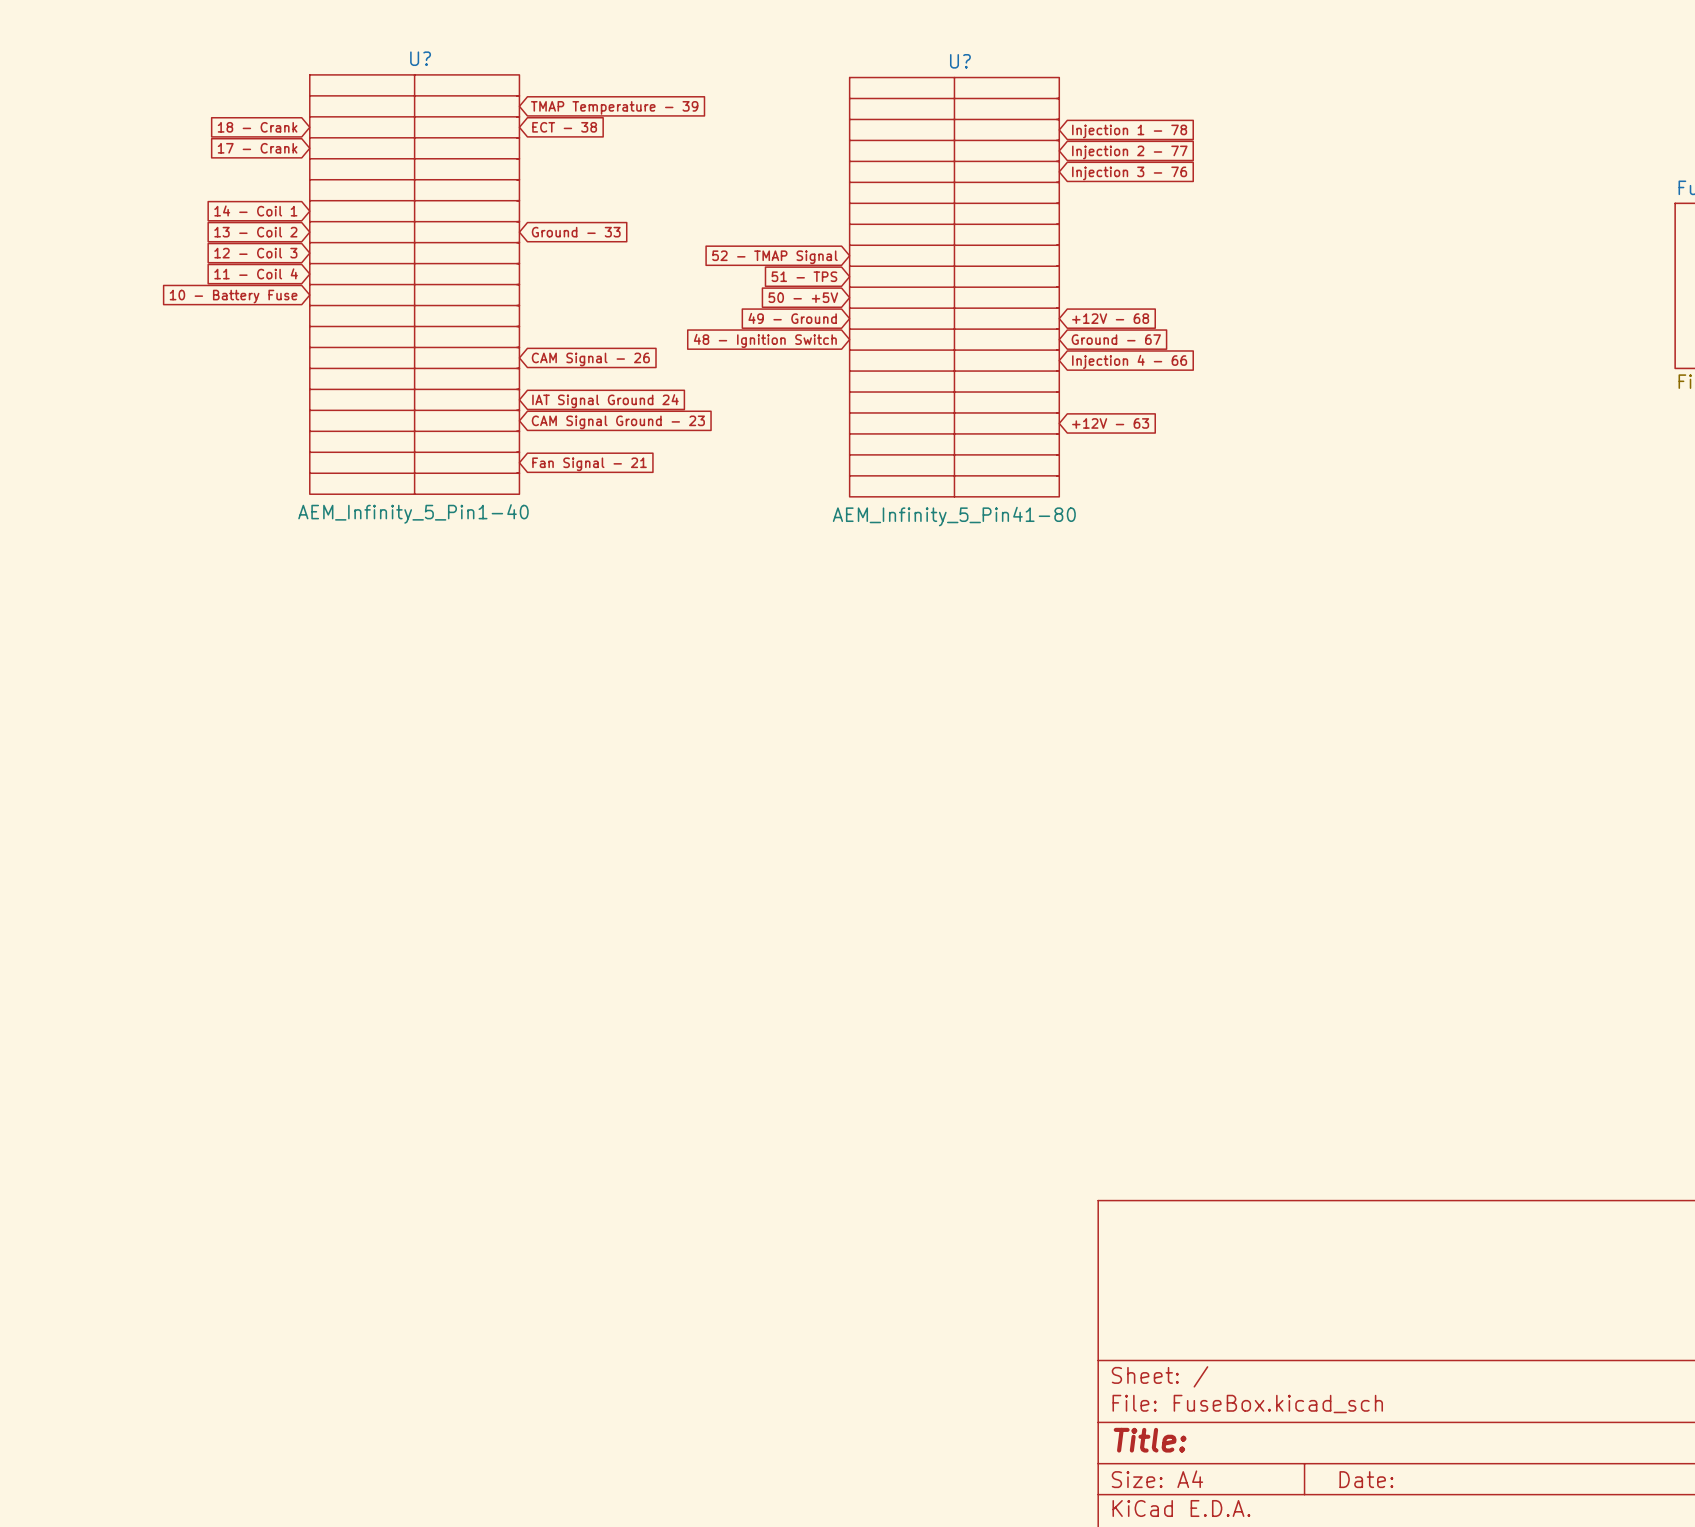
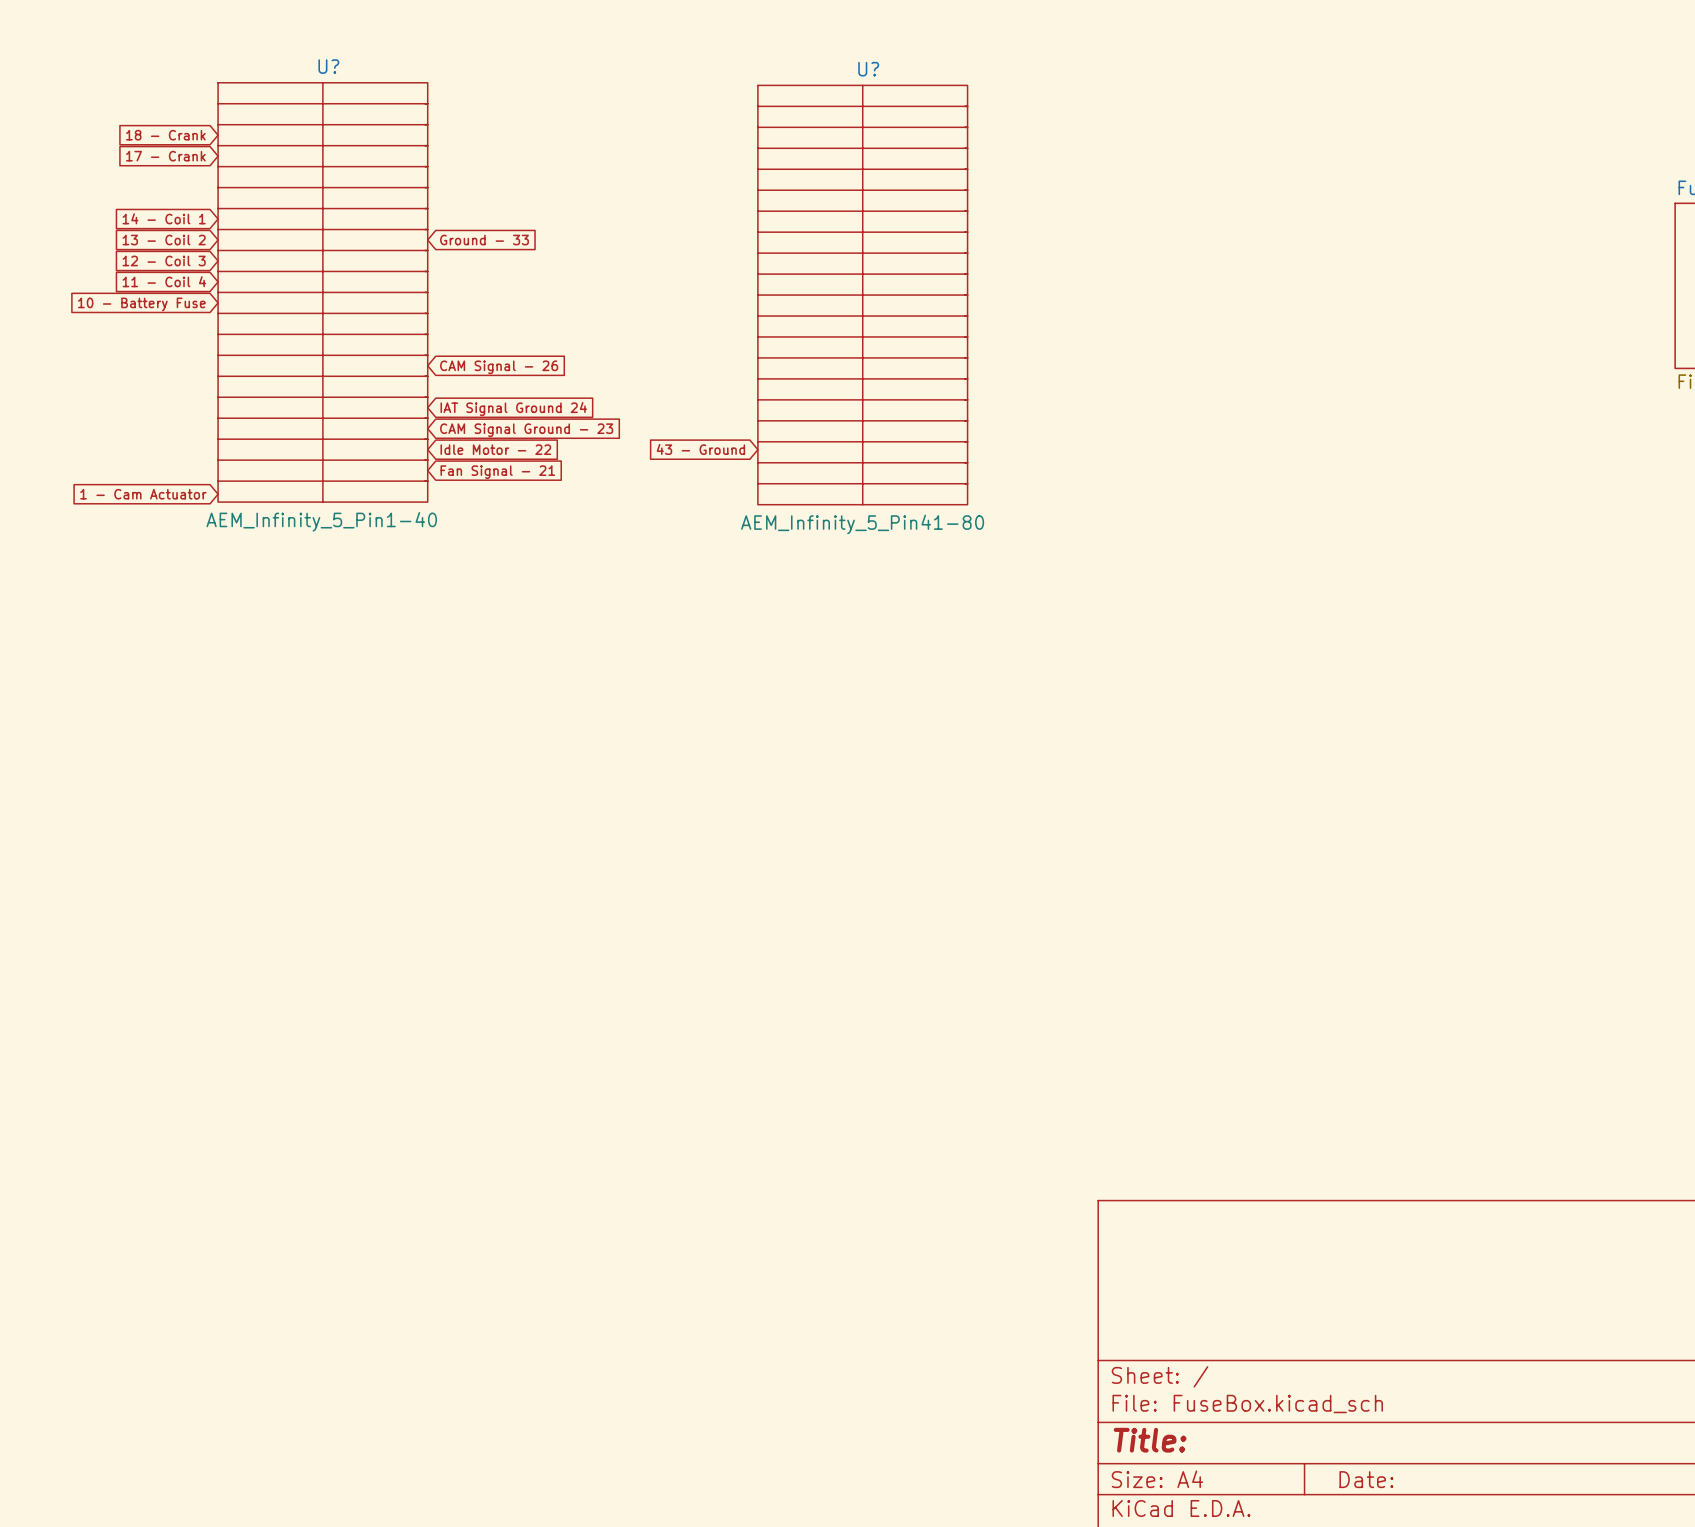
global label: TMAP Temperature - 39 (614, 107) -> none
global label position: 18 - Crank (257, 127) -> 18 - Crank (165, 135)
global label: ECT - 38 (564, 127) -> none
global label: Injection 1 - 78 (1129, 131) -> none
global label position: 17 - Crank (257, 148) -> 17 - Crank (165, 156)
global label: Injection 2 - 77 (1129, 152) -> none
global label: Injection 3 - 76 (1129, 173) -> none
global label position: 14 - Coil 1 (255, 210) -> 14 - Coil 1 (164, 218)
global label position: 13 - Coil 2 (255, 232) -> 13 - Coil 2 (164, 240)
global label position: Ground - 33 (576, 232) -> Ground - 33 (484, 240)
global label position: 12 - Coil 3 (255, 253) -> 12 - Coil 3 (164, 260)
global label: 52 - TMAP Signal (774, 257) -> none
global label position: 11 - Coil 4 (256, 273) -> 11 - Coil 4 (164, 281)
global label: 51 - TPS (804, 276) -> none
U? position: (414, 284) -> (322, 292)
U? position: (954, 287) -> (862, 295)
global label position: 10 - Battery Fuse (233, 296) -> 10 - Battery Fuse (141, 304)
global label: 50 - +5V (803, 297) -> none
global label: 49 - Ground (792, 318) -> none
global label: +12V - 68 (1110, 318) -> none
global label: Ground - 67 (1116, 339) -> none
global label: 48 - Ignition Switch (765, 340) -> none
global label position: CAM Signal - 26 (590, 359) -> CAM Signal - 26 (499, 367)
global label: Injection 4 - 66 (1129, 361) -> none
global label position: IAT Signal Ground 24 (605, 401) -> IAT Signal Ground 24 (513, 409)
global label position: CAM Signal Ground - 23 (618, 422) -> CAM Signal Ground - 23 (526, 430)
global label: +12V - 63 (1110, 423) -> none
global label: none -> Idle Motor - 22 (495, 449)
global label: none -> 43 - Ground (700, 449)
global label position: Fan Signal - 21 (589, 464) -> Fan Signal - 21 (497, 472)
global label: none -> 1 - Cam Actuator (143, 494)

